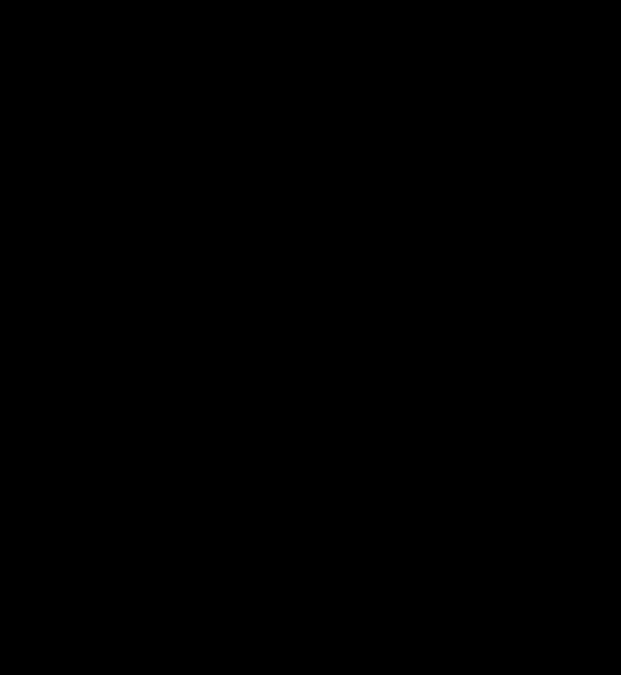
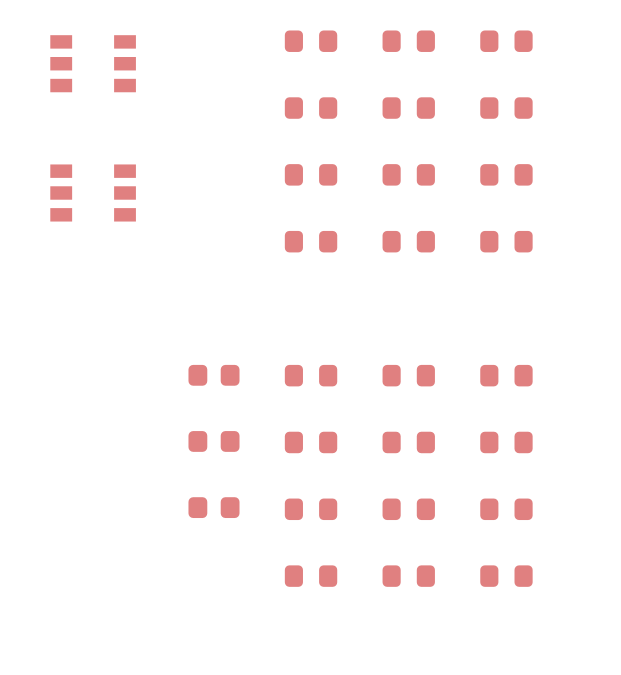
part: none -> (311, 41)
part: none -> (408, 41)
part: none -> (506, 41)
part: none -> (93, 63)
part: none -> (311, 108)
part: none -> (408, 108)
part: none -> (506, 108)
part: none -> (311, 174)
part: none -> (408, 174)
part: none -> (506, 174)
part: none -> (93, 192)
part: none -> (311, 241)
part: none -> (408, 241)
part: none -> (506, 241)
part: none -> (213, 375)
part: none -> (311, 375)
part: none -> (408, 375)
part: none -> (506, 375)
part: none -> (213, 441)
part: none -> (311, 442)
part: none -> (408, 442)
part: none -> (506, 442)
part: none -> (213, 507)
part: none -> (311, 509)
part: none -> (408, 509)
part: none -> (506, 509)
part: none -> (311, 576)
part: none -> (408, 576)
part: none -> (506, 576)

